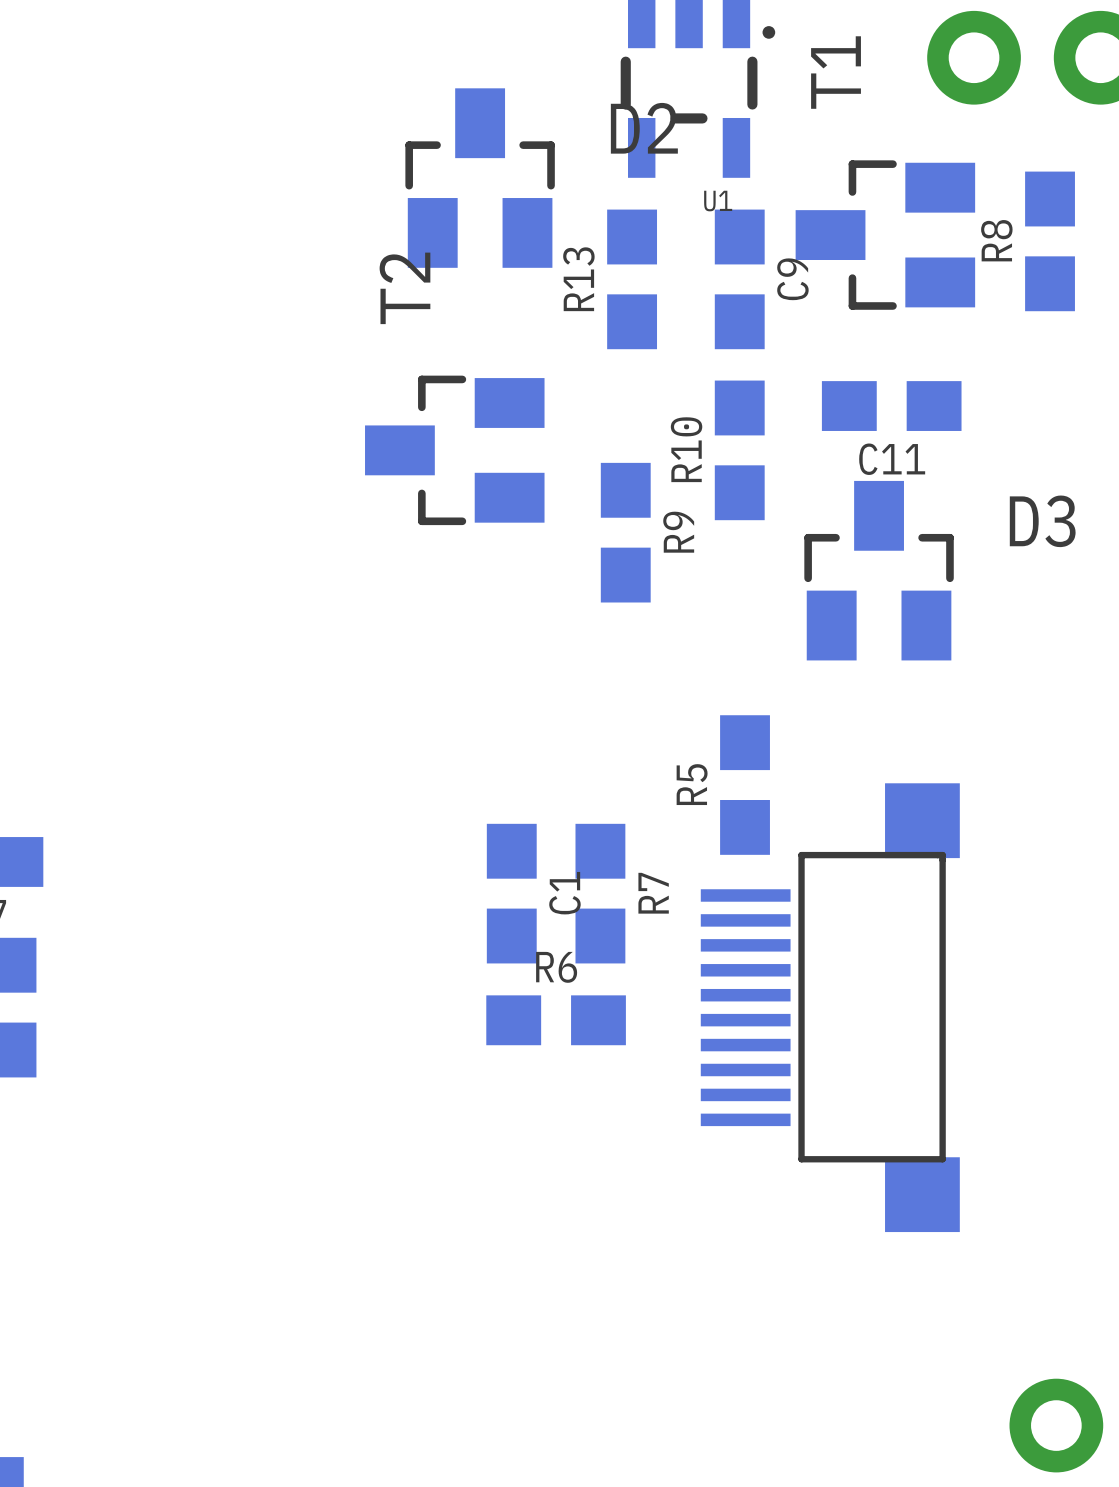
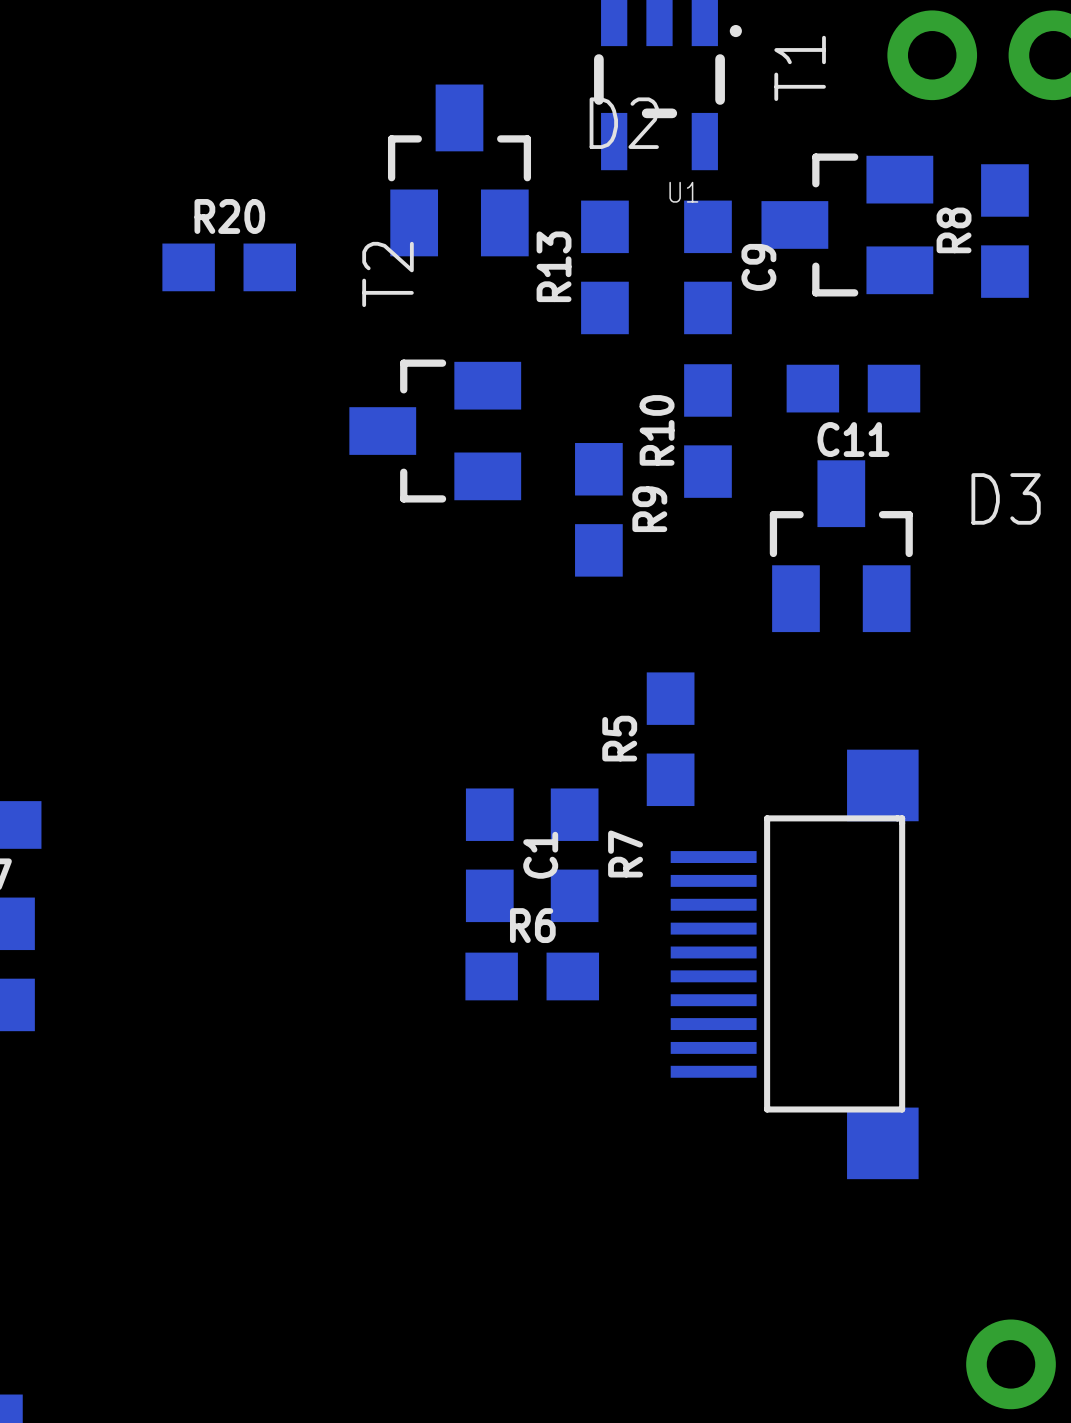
R20: none -> (229, 267)
R5 position: (745, 785) -> (670, 739)

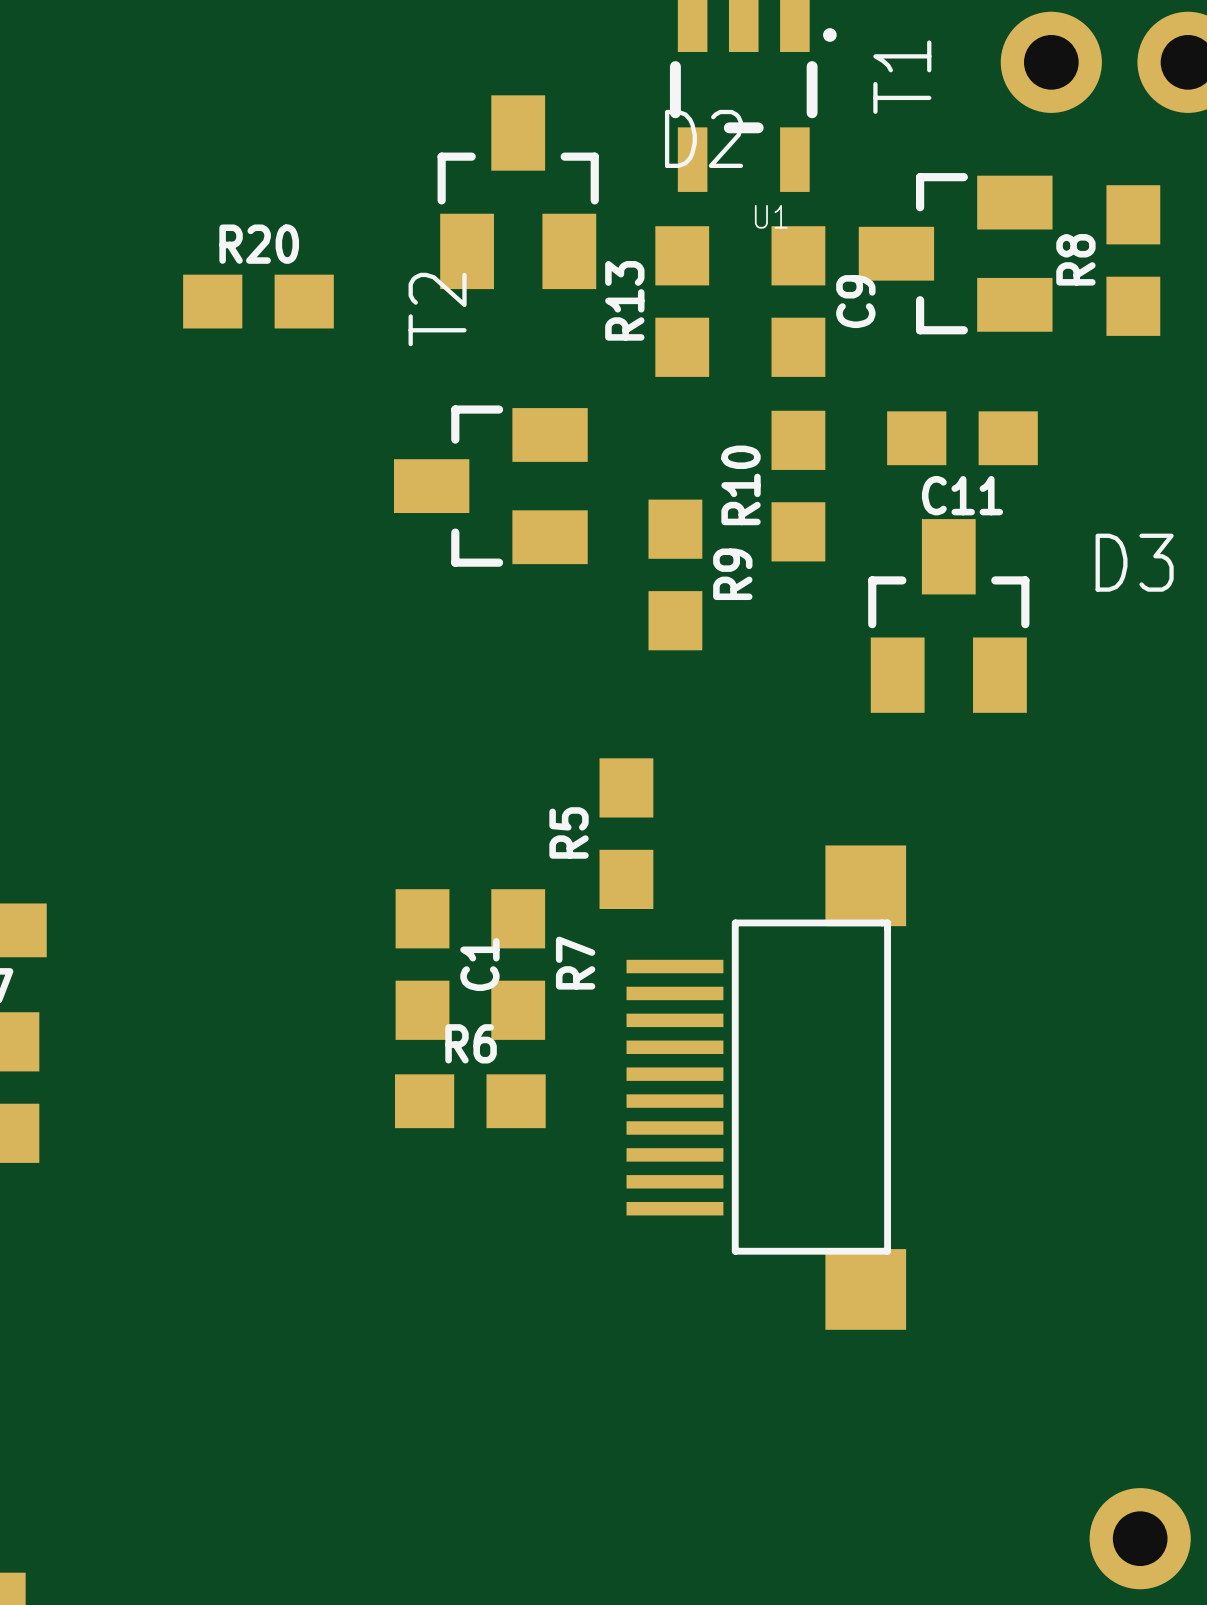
R5 position: (670, 739) -> (626, 833)
C1 position: (489, 855) -> (422, 964)
R7 position: (574, 855) -> (518, 964)
part position: (794, 964) -> (766, 1087)
R6 position: (532, 976) -> (470, 1101)

